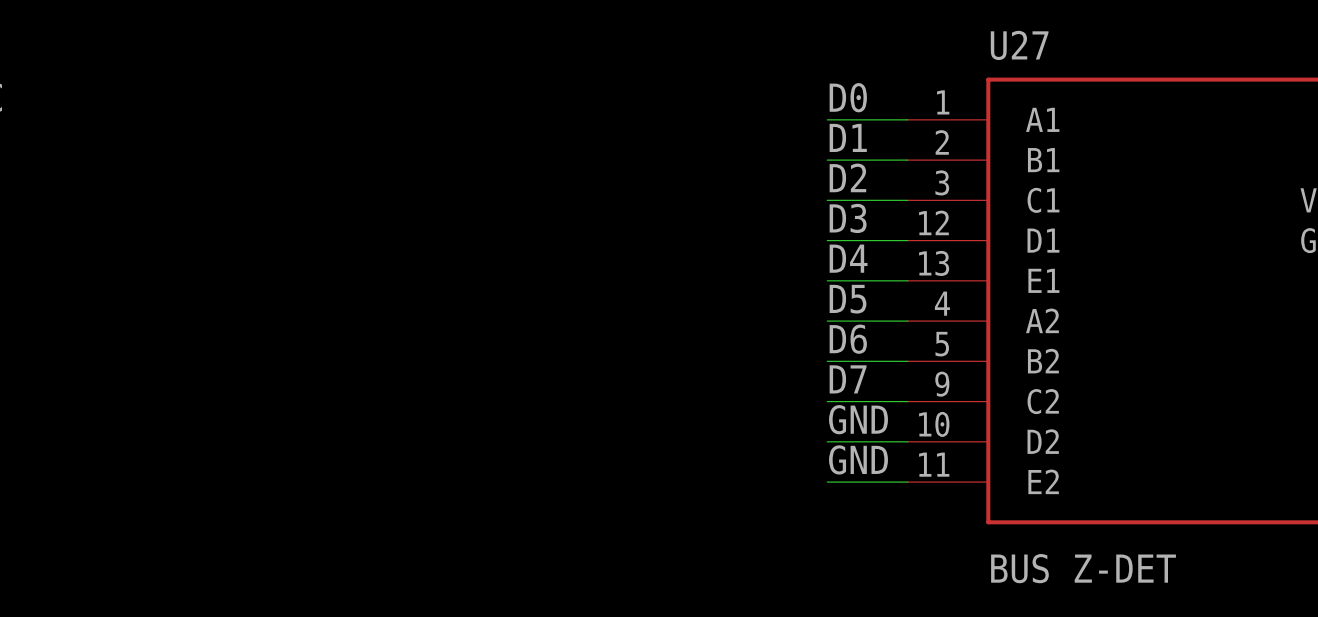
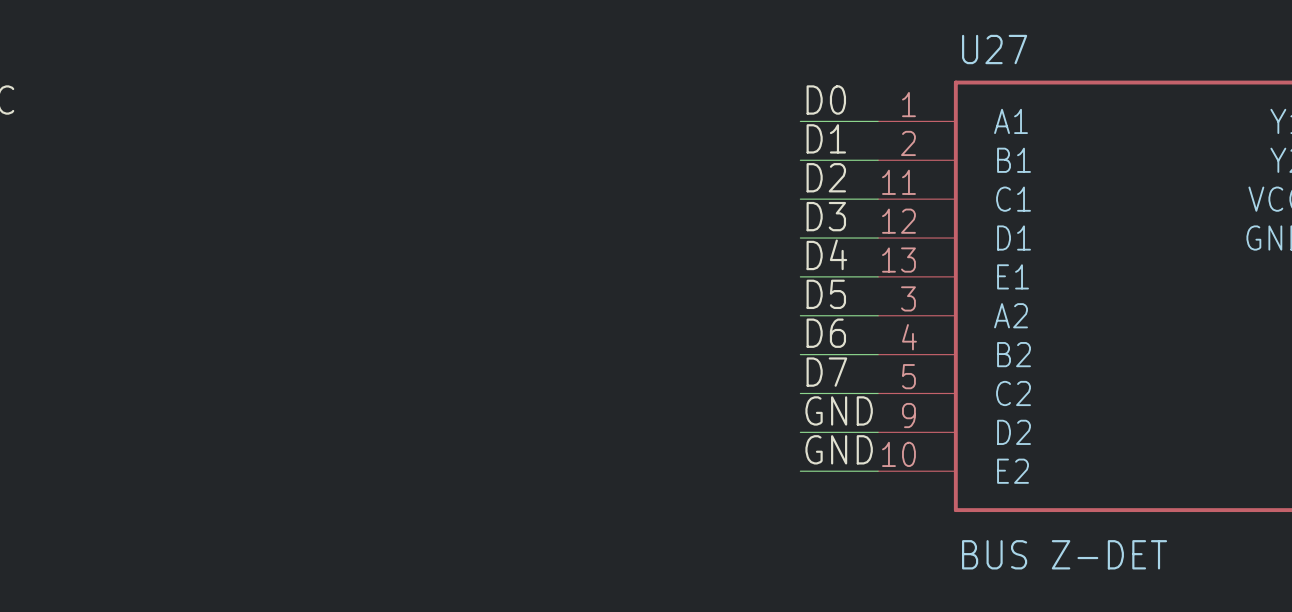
U27 pin number: 3 (942, 182) -> 11 (898, 182)
U27 pin number: 4 (942, 303) -> 3 (908, 298)
U27 pin number: 5 (942, 344) -> 4 (909, 337)
U27 pin number: 9 (942, 384) -> 5 (908, 376)
U27 pin number: 10 (934, 424) -> 9 (908, 415)
U27 pin number: 11 (934, 464) -> 10 (898, 454)

